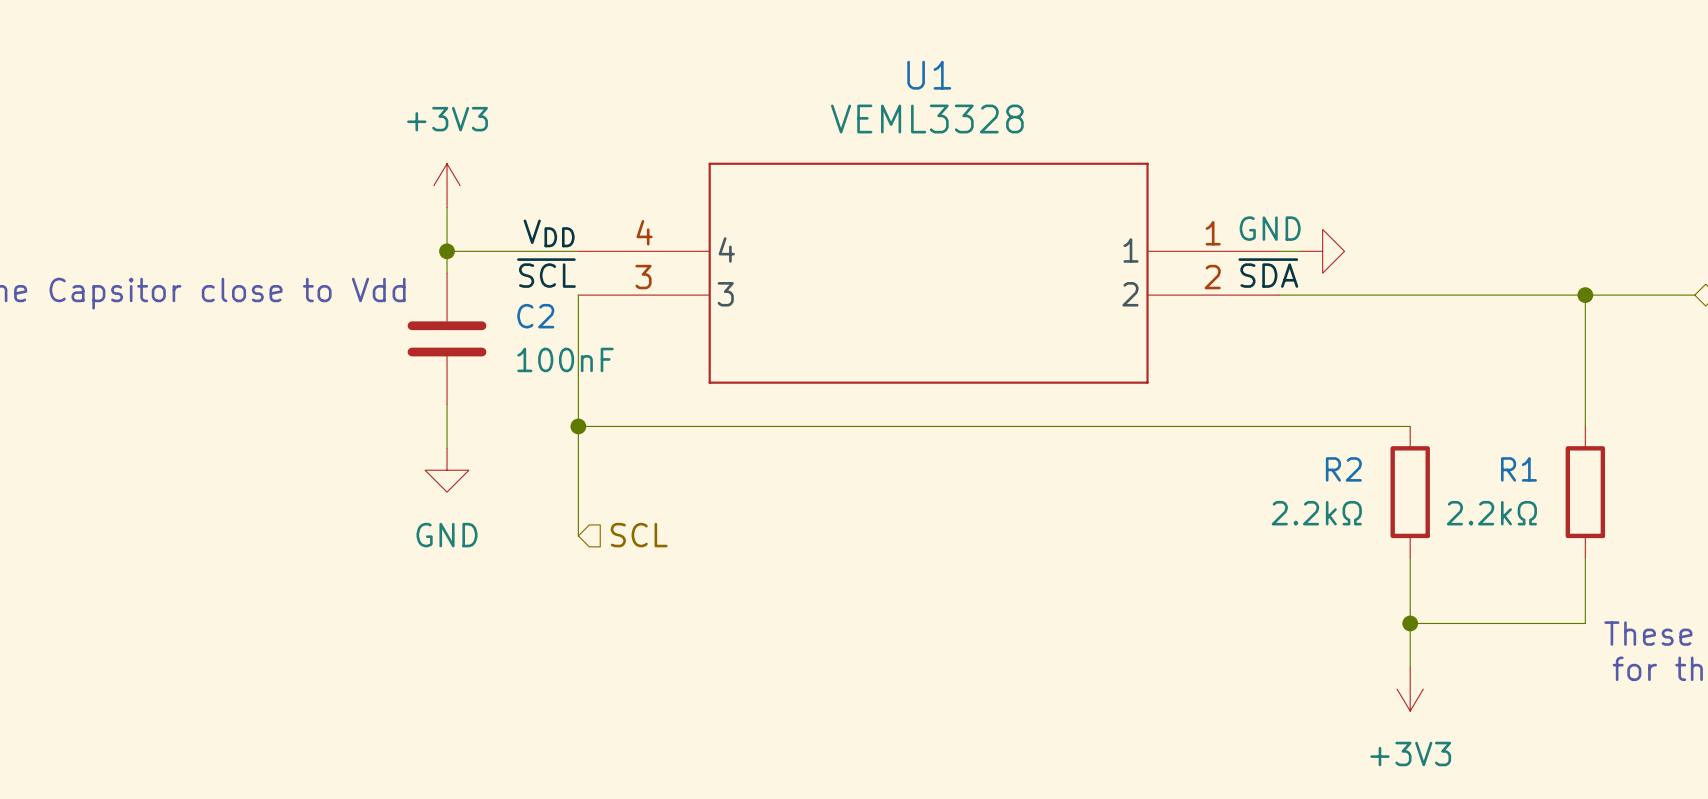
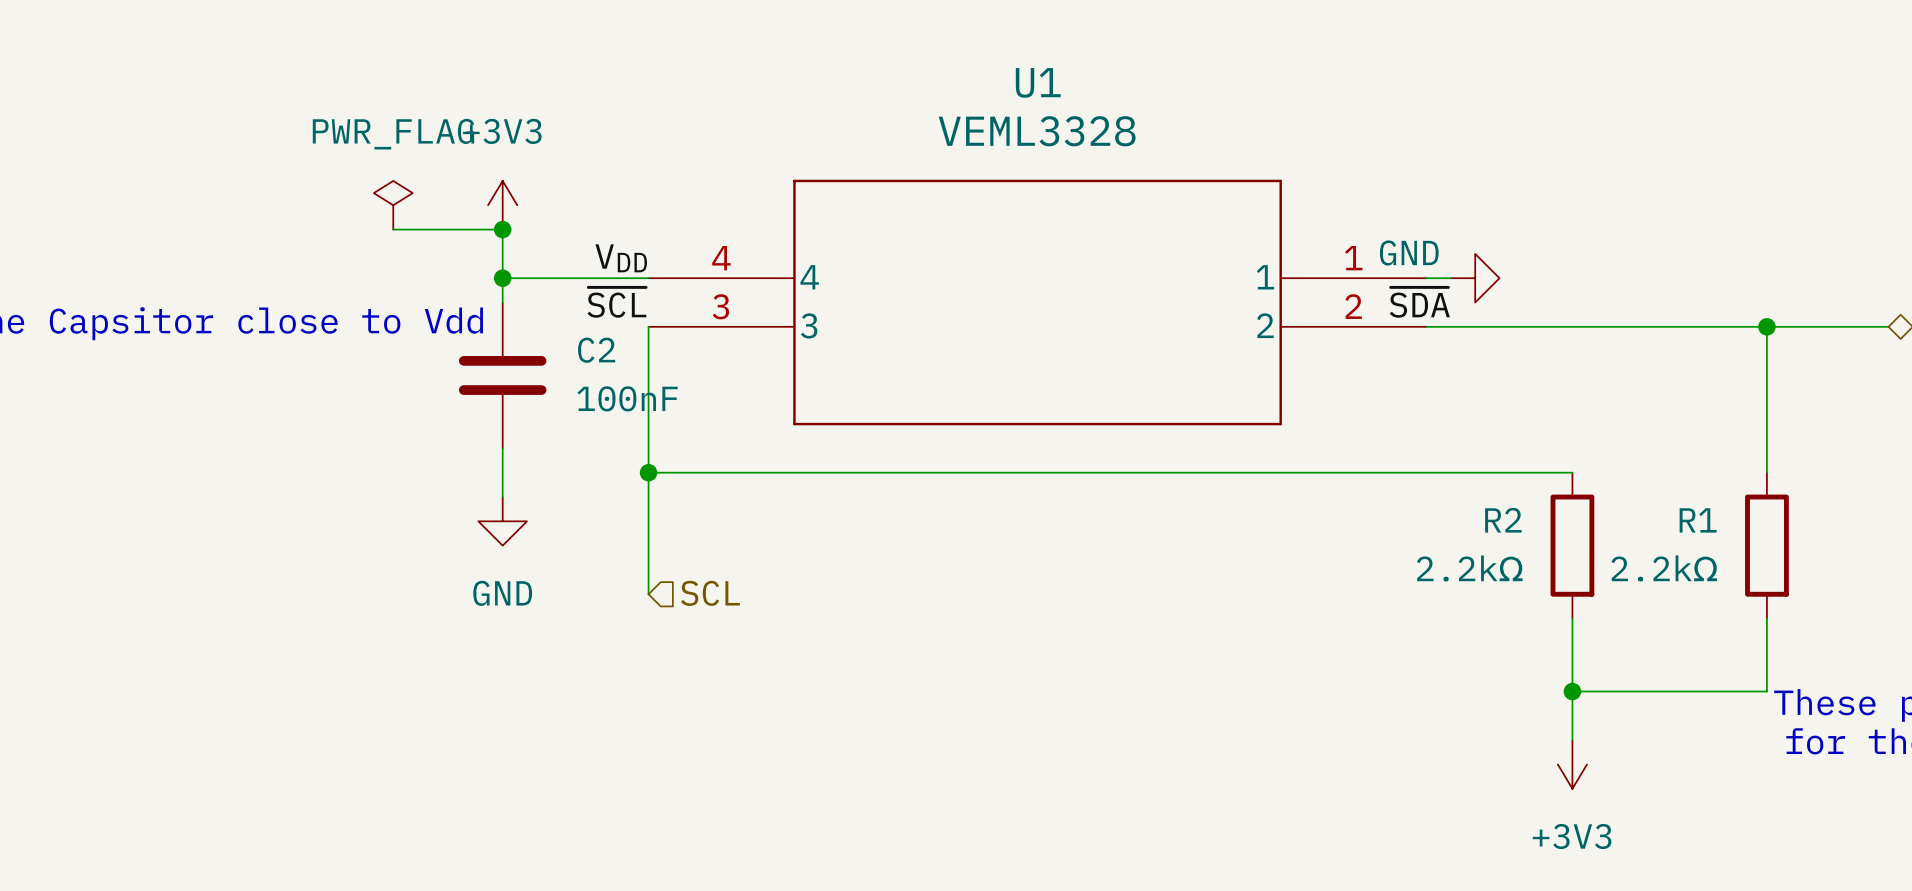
power symbol: none -> PWR_FLAG (393, 205)
wire: none -> (393, 229) (502, 229)
junction: none -> (502, 229)

